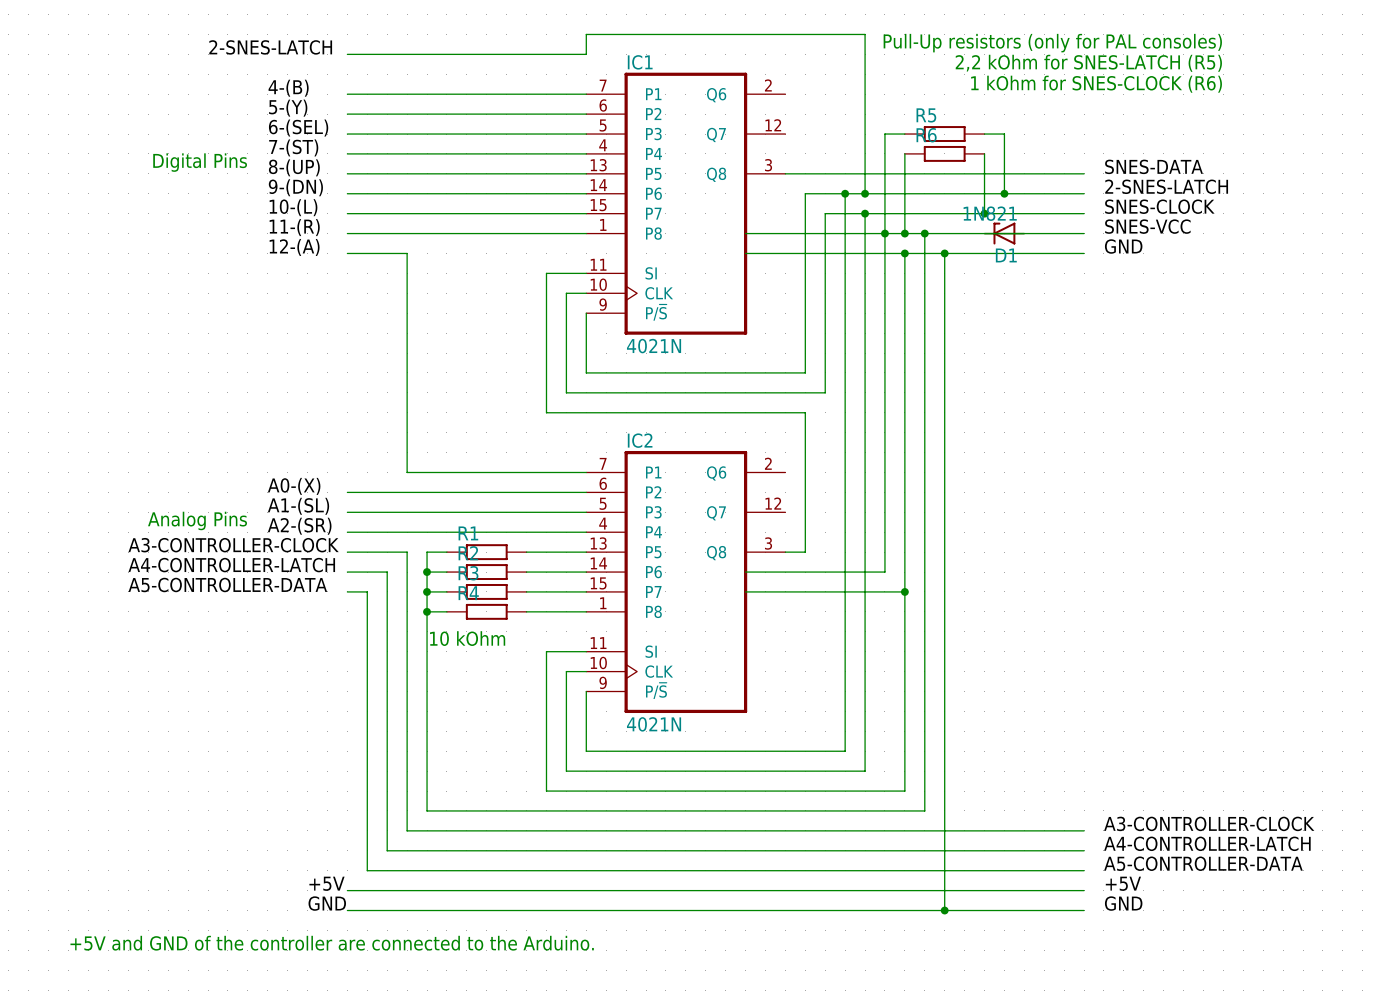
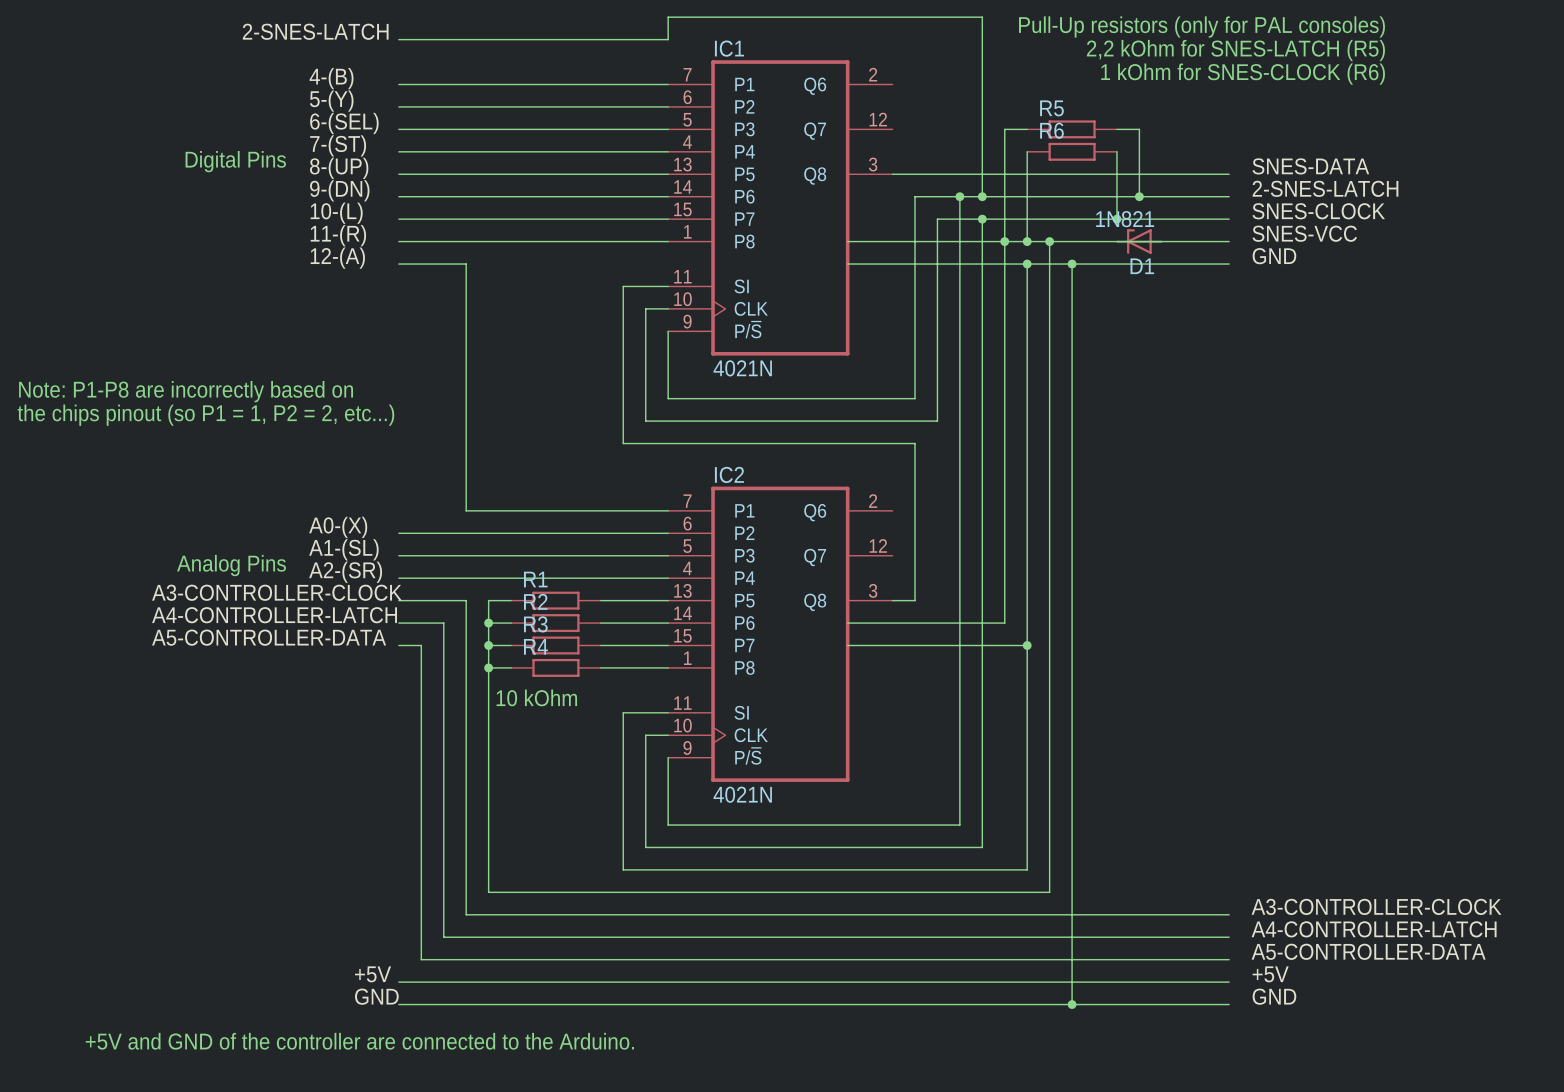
text: none -> Note: P1-P8 are incorrectly based on (186, 391)
text: none -> the chips pinout (so P1 = 1, P2 = 2, etc...) (205, 415)

